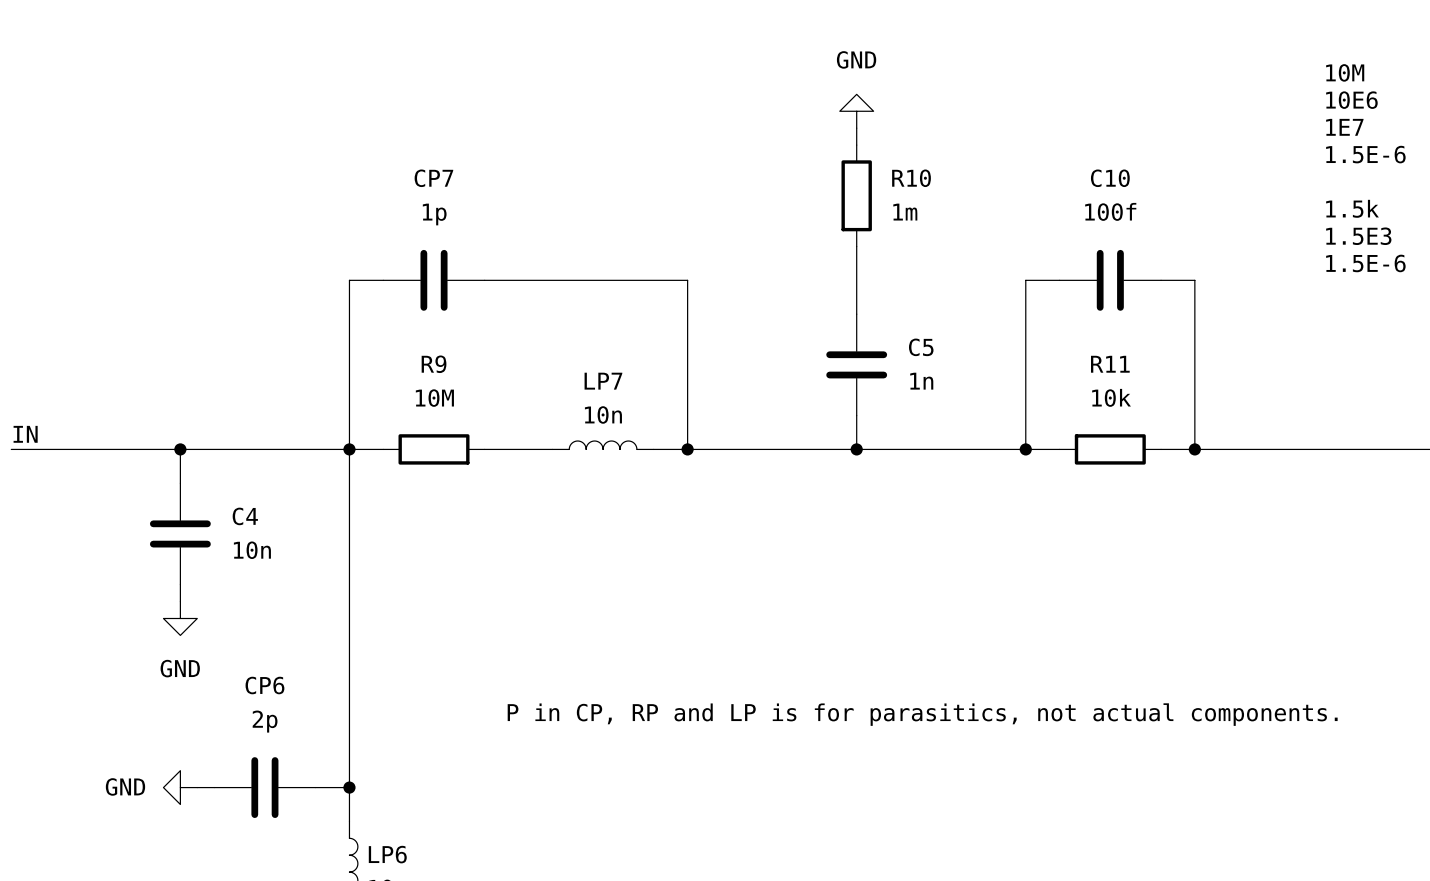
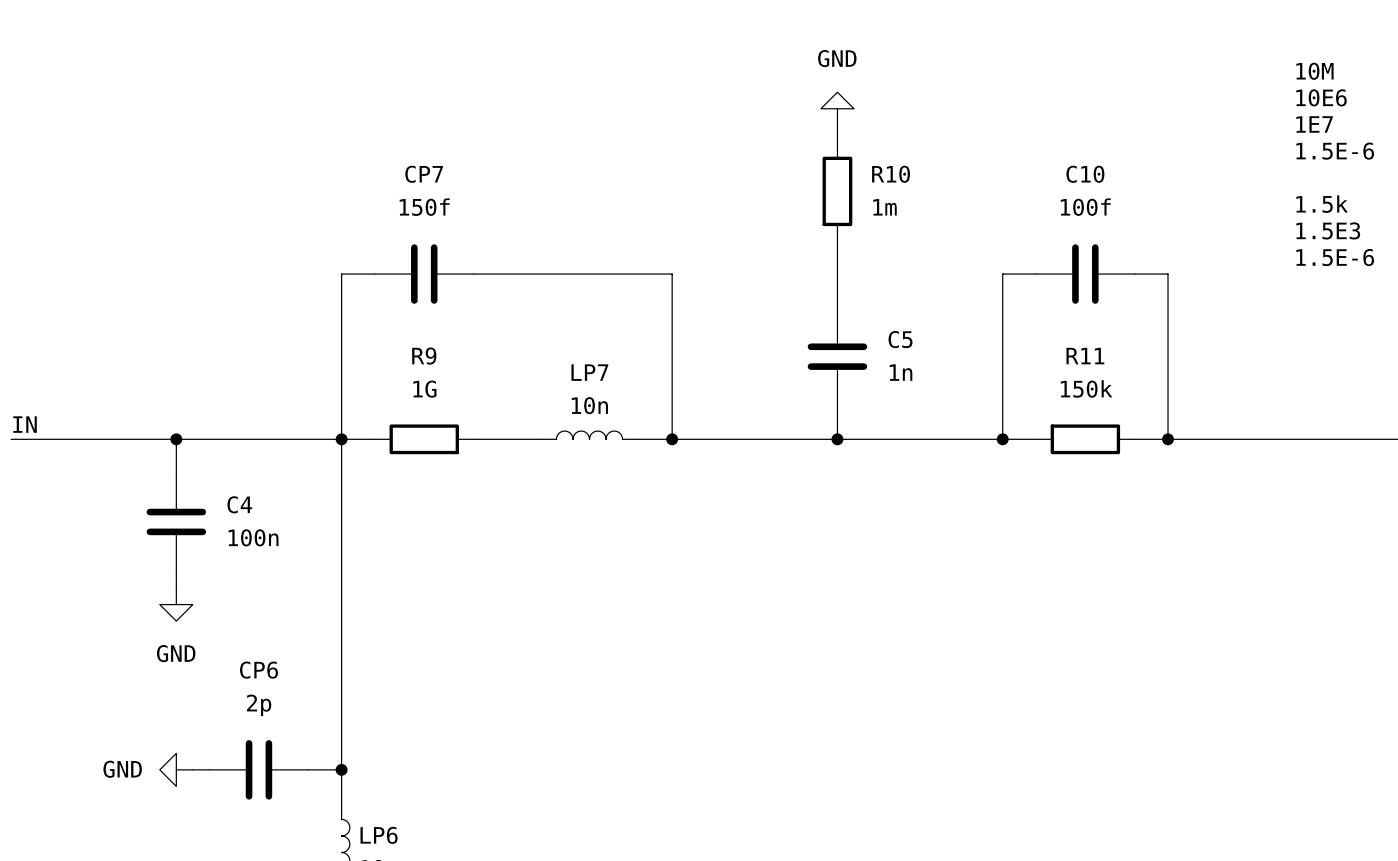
CP7 value: 1p (434, 214) -> 150f (424, 207)
R11 value: 10k (1111, 397) -> 150k (1086, 388)
R9 value: 10M (434, 398) -> 1G (424, 389)
C4 value: 10n (252, 550) -> 100n (253, 537)
text: P in CP, RP and LP is for parasitics, not actual components. (922, 714) -> none

